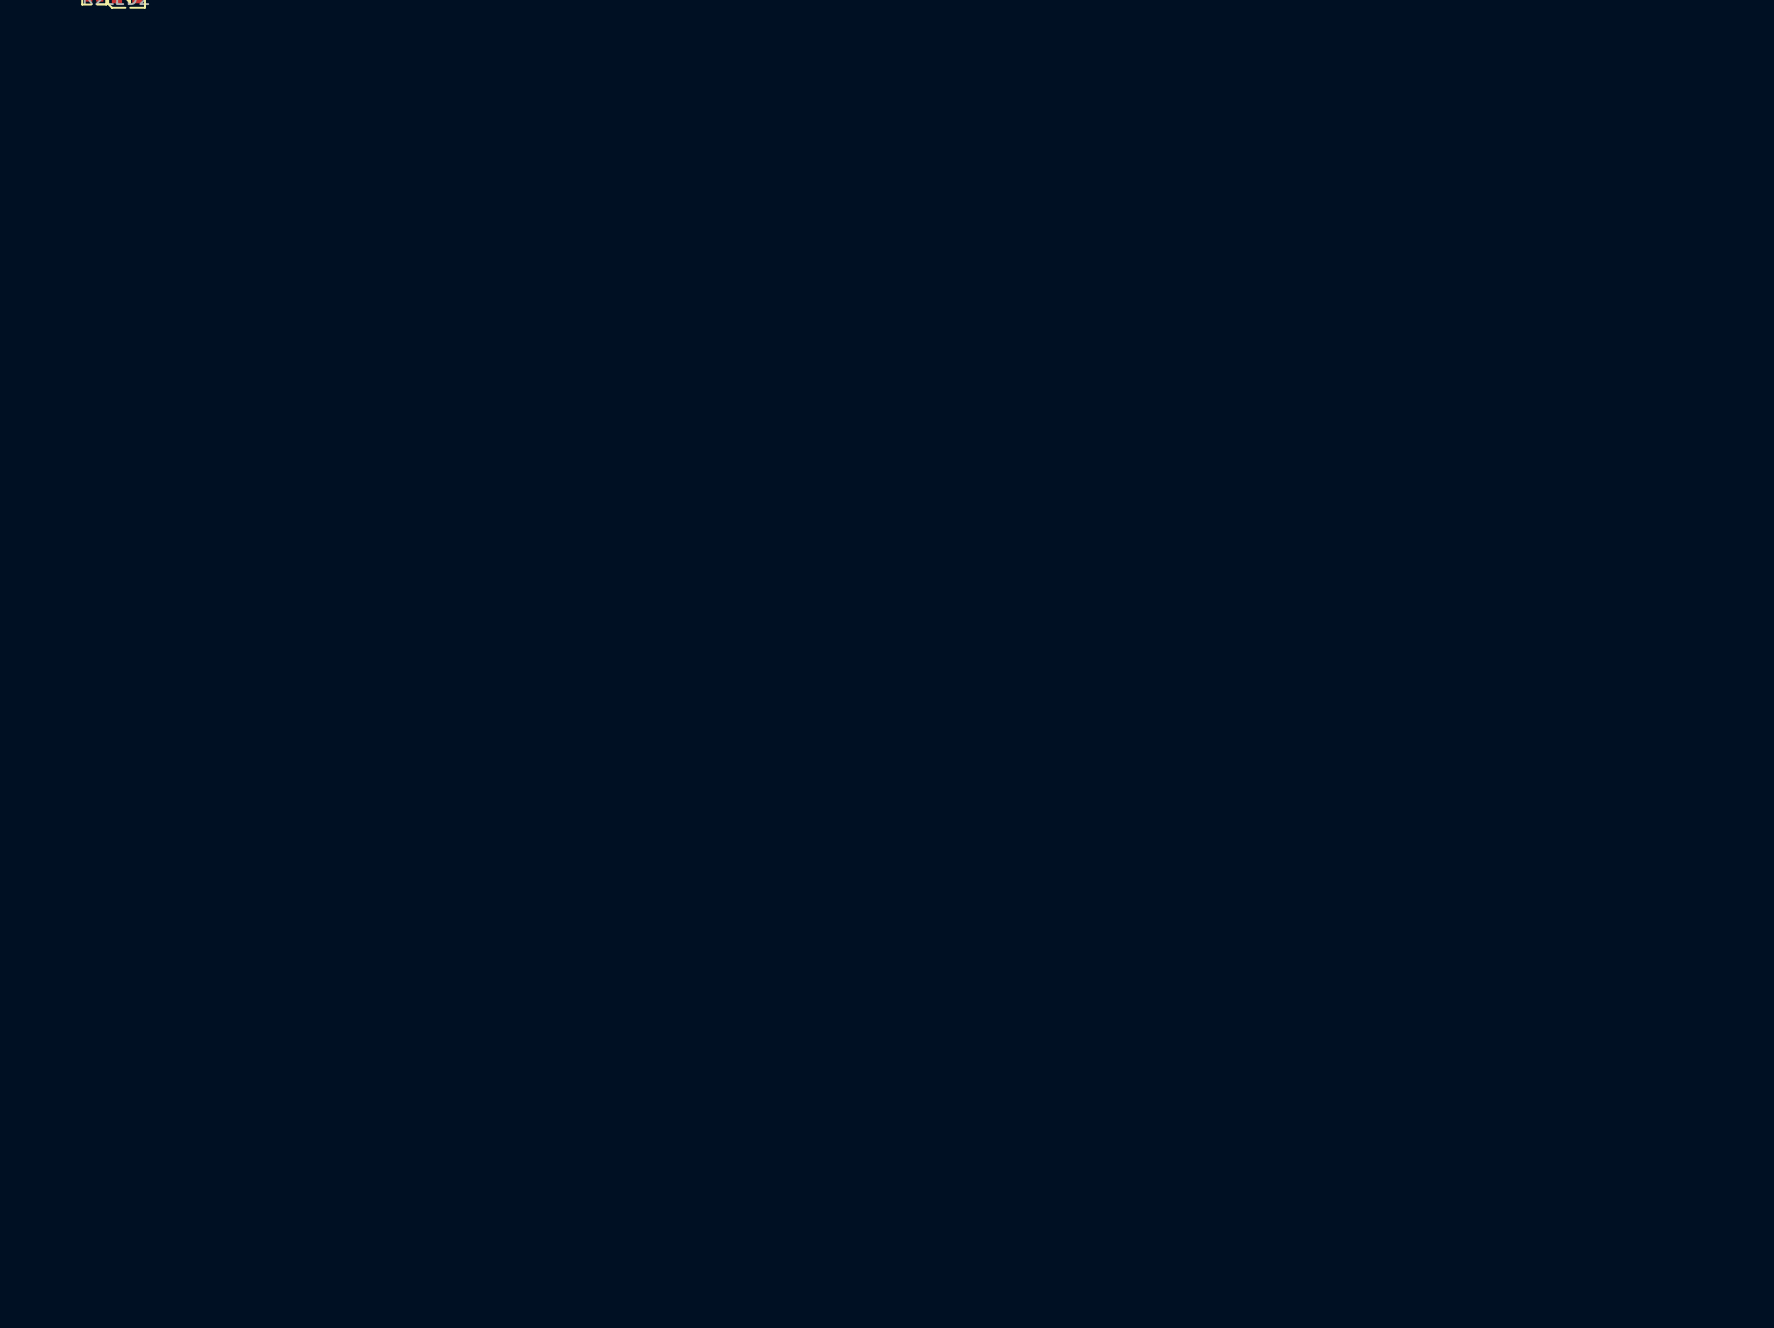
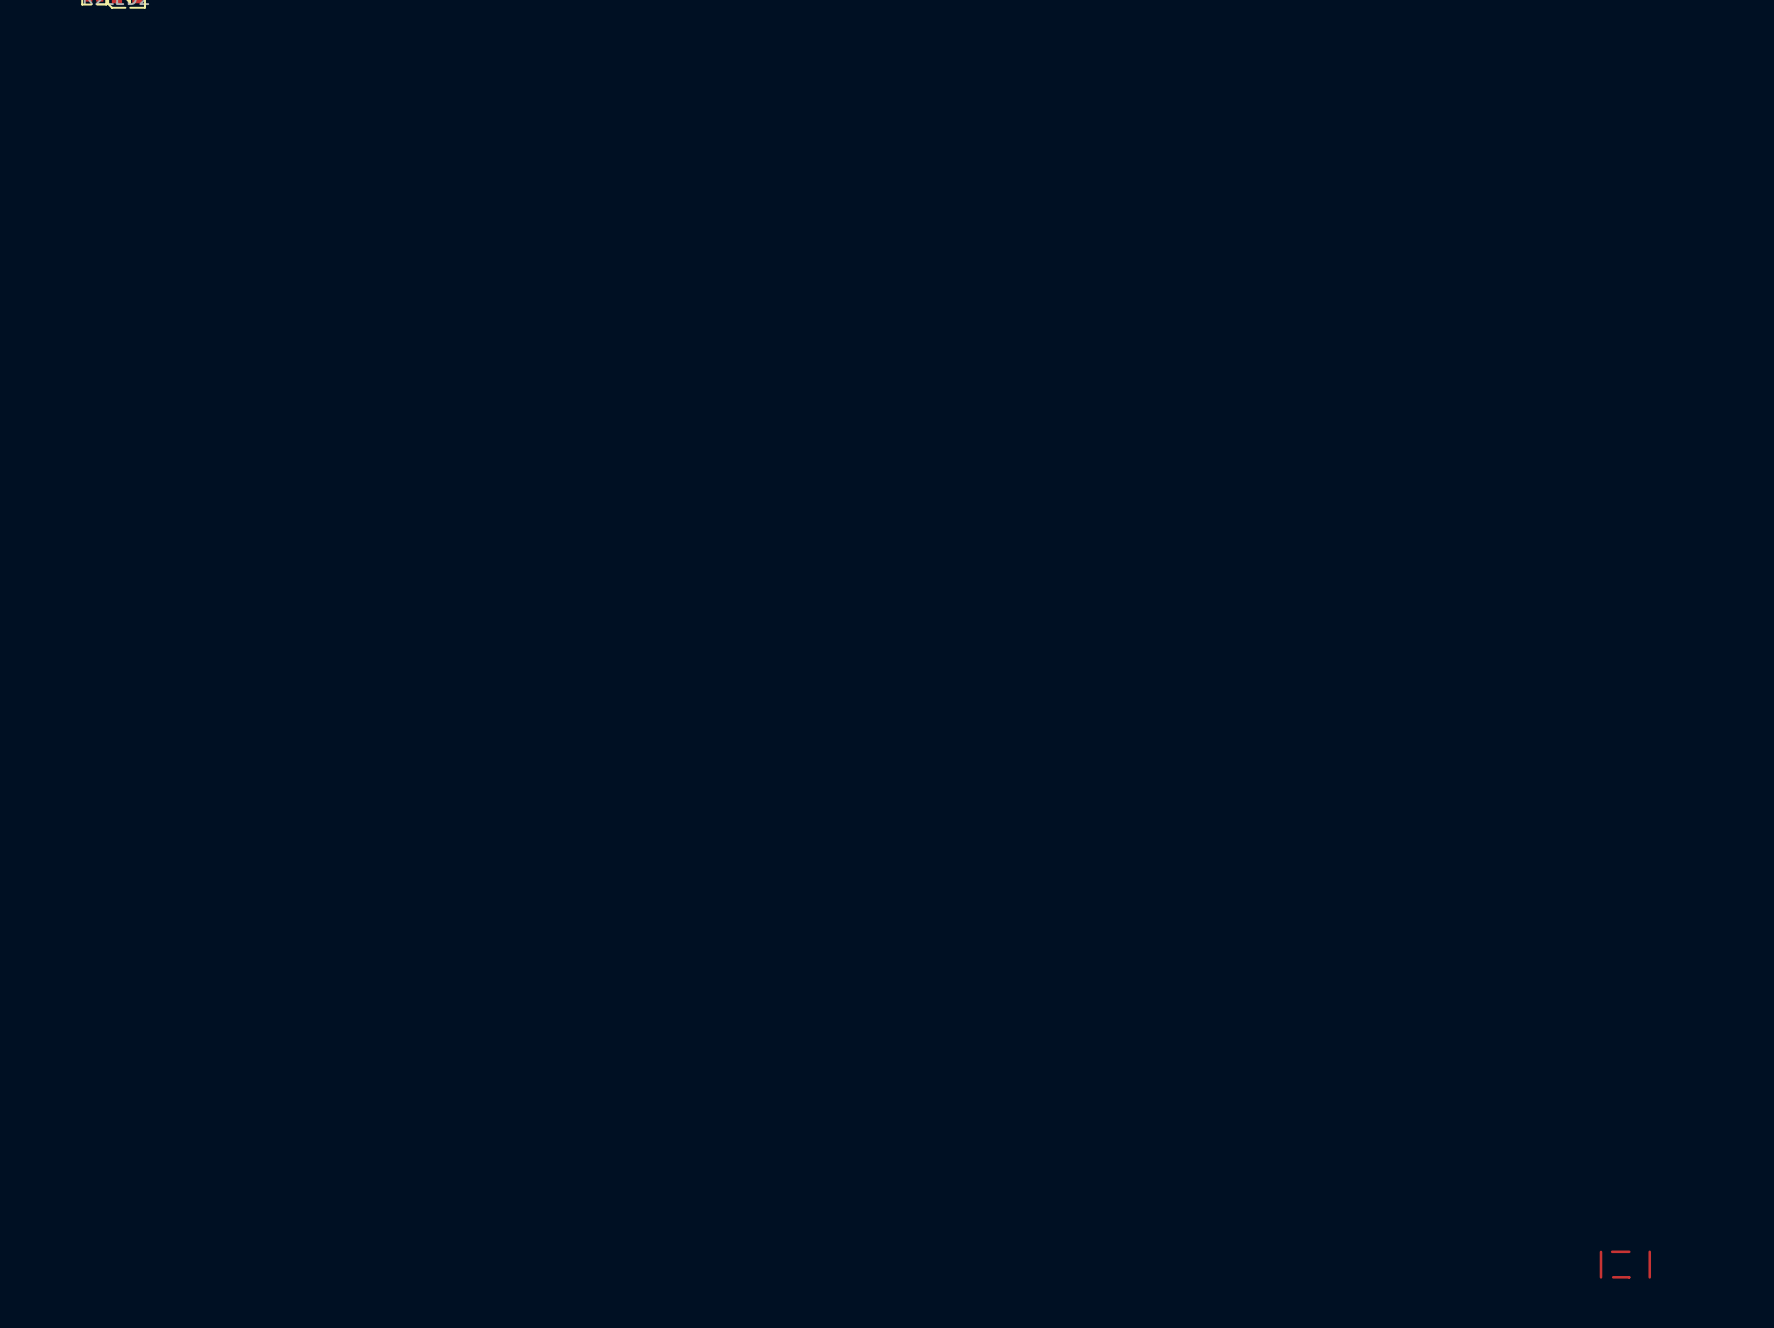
track: none -> (1600, 1251) (1600, 1277)
track: none -> (1612, 1251) (1629, 1251)
track: none -> (1649, 1251) (1649, 1277)
track: none -> (1613, 1277) (1629, 1277)

